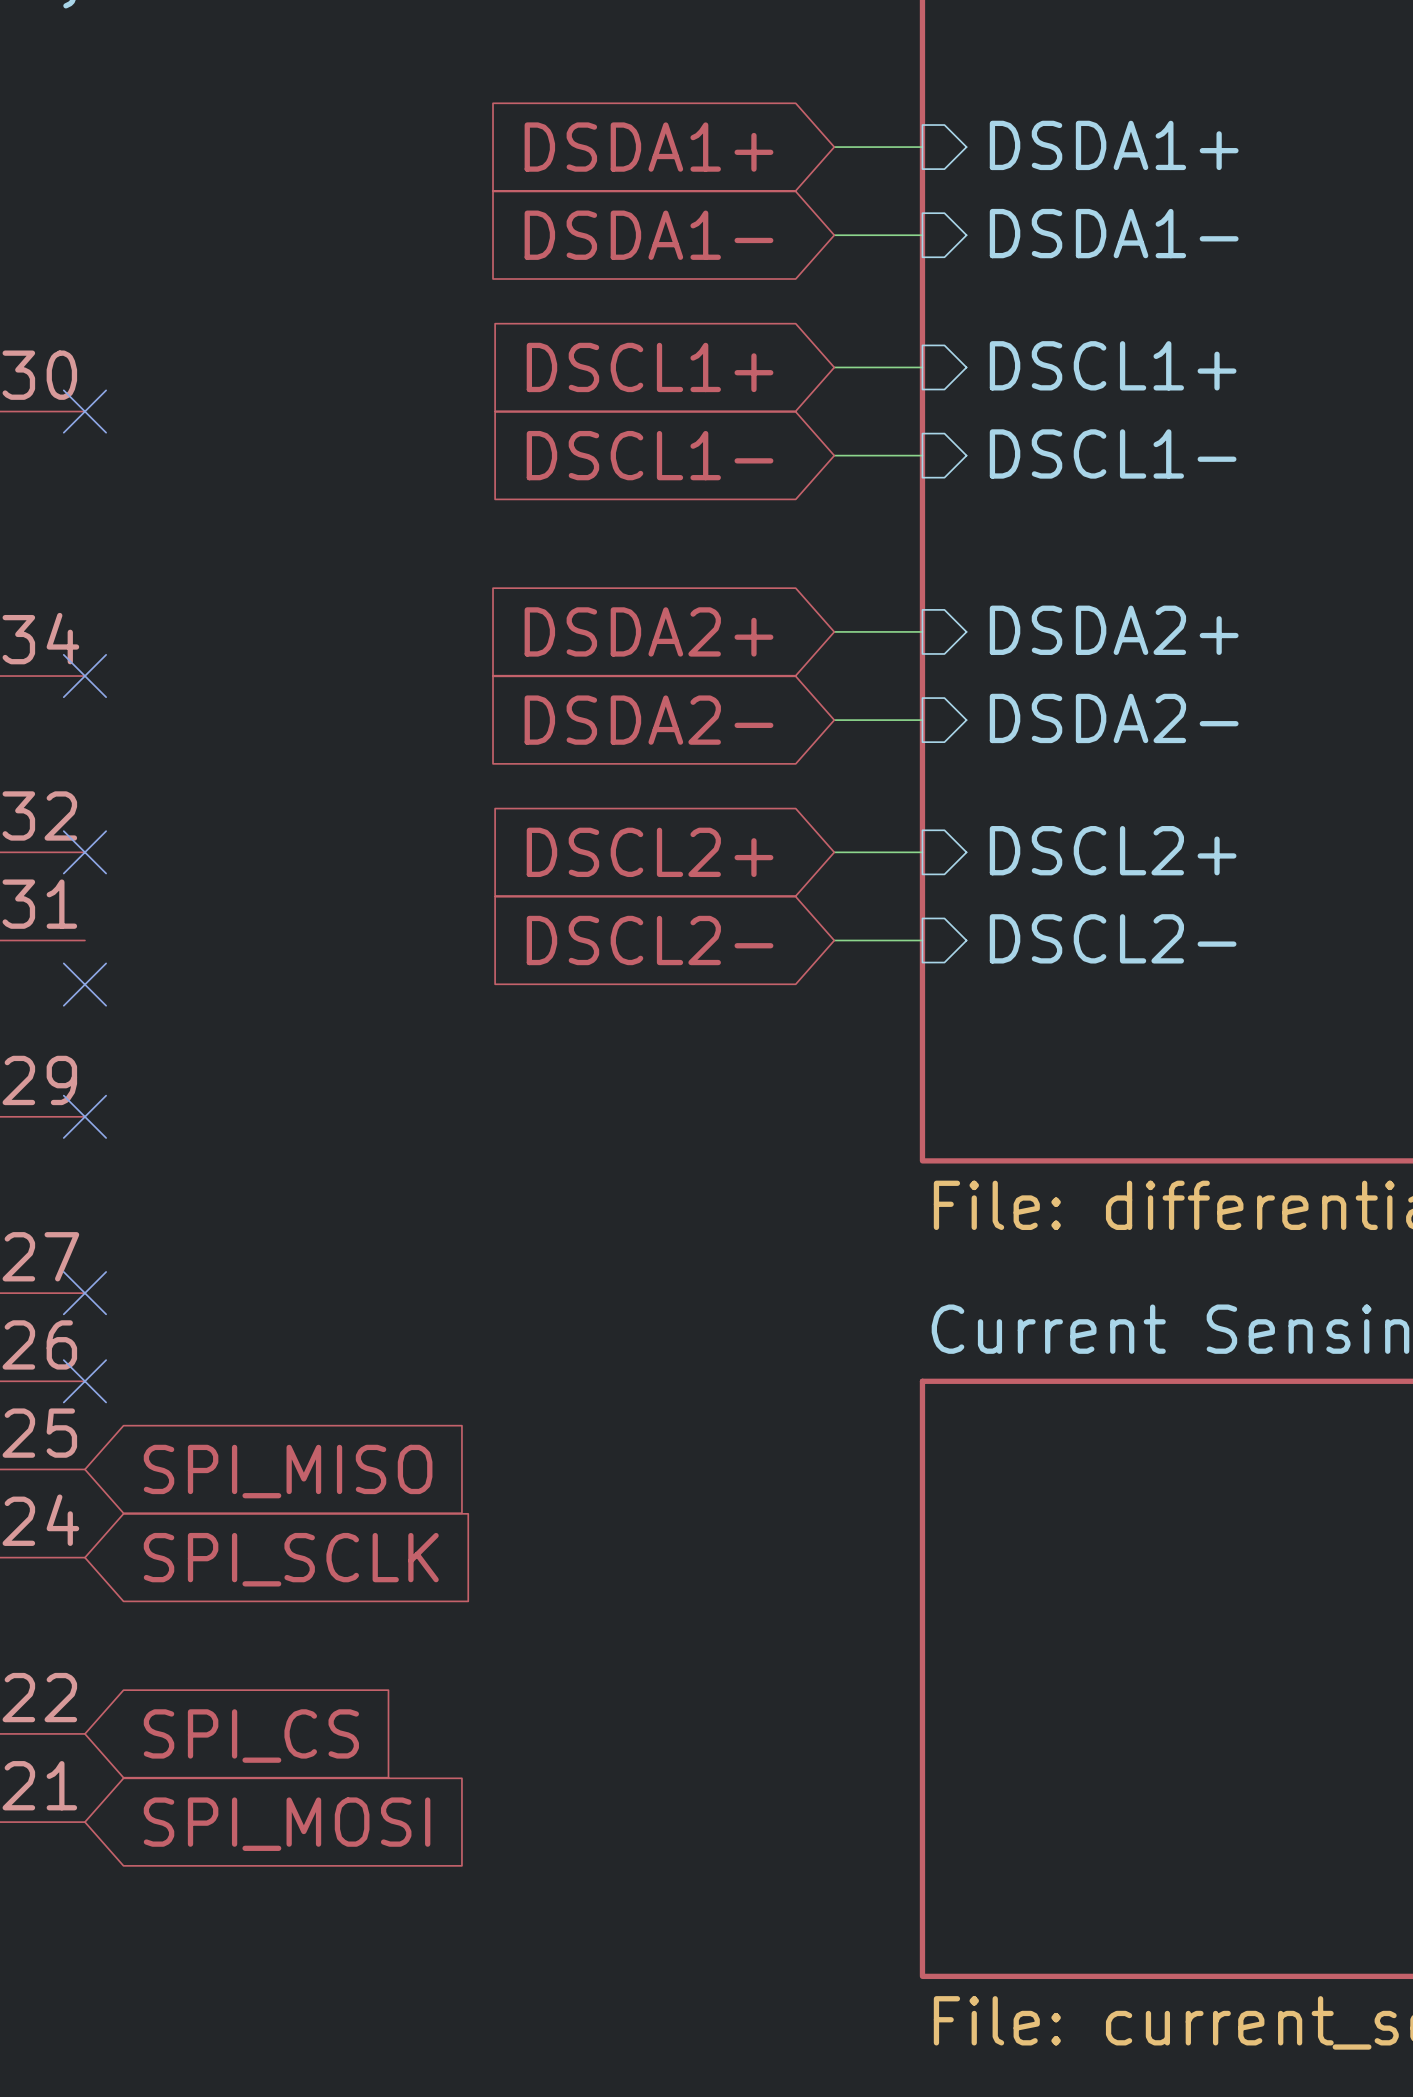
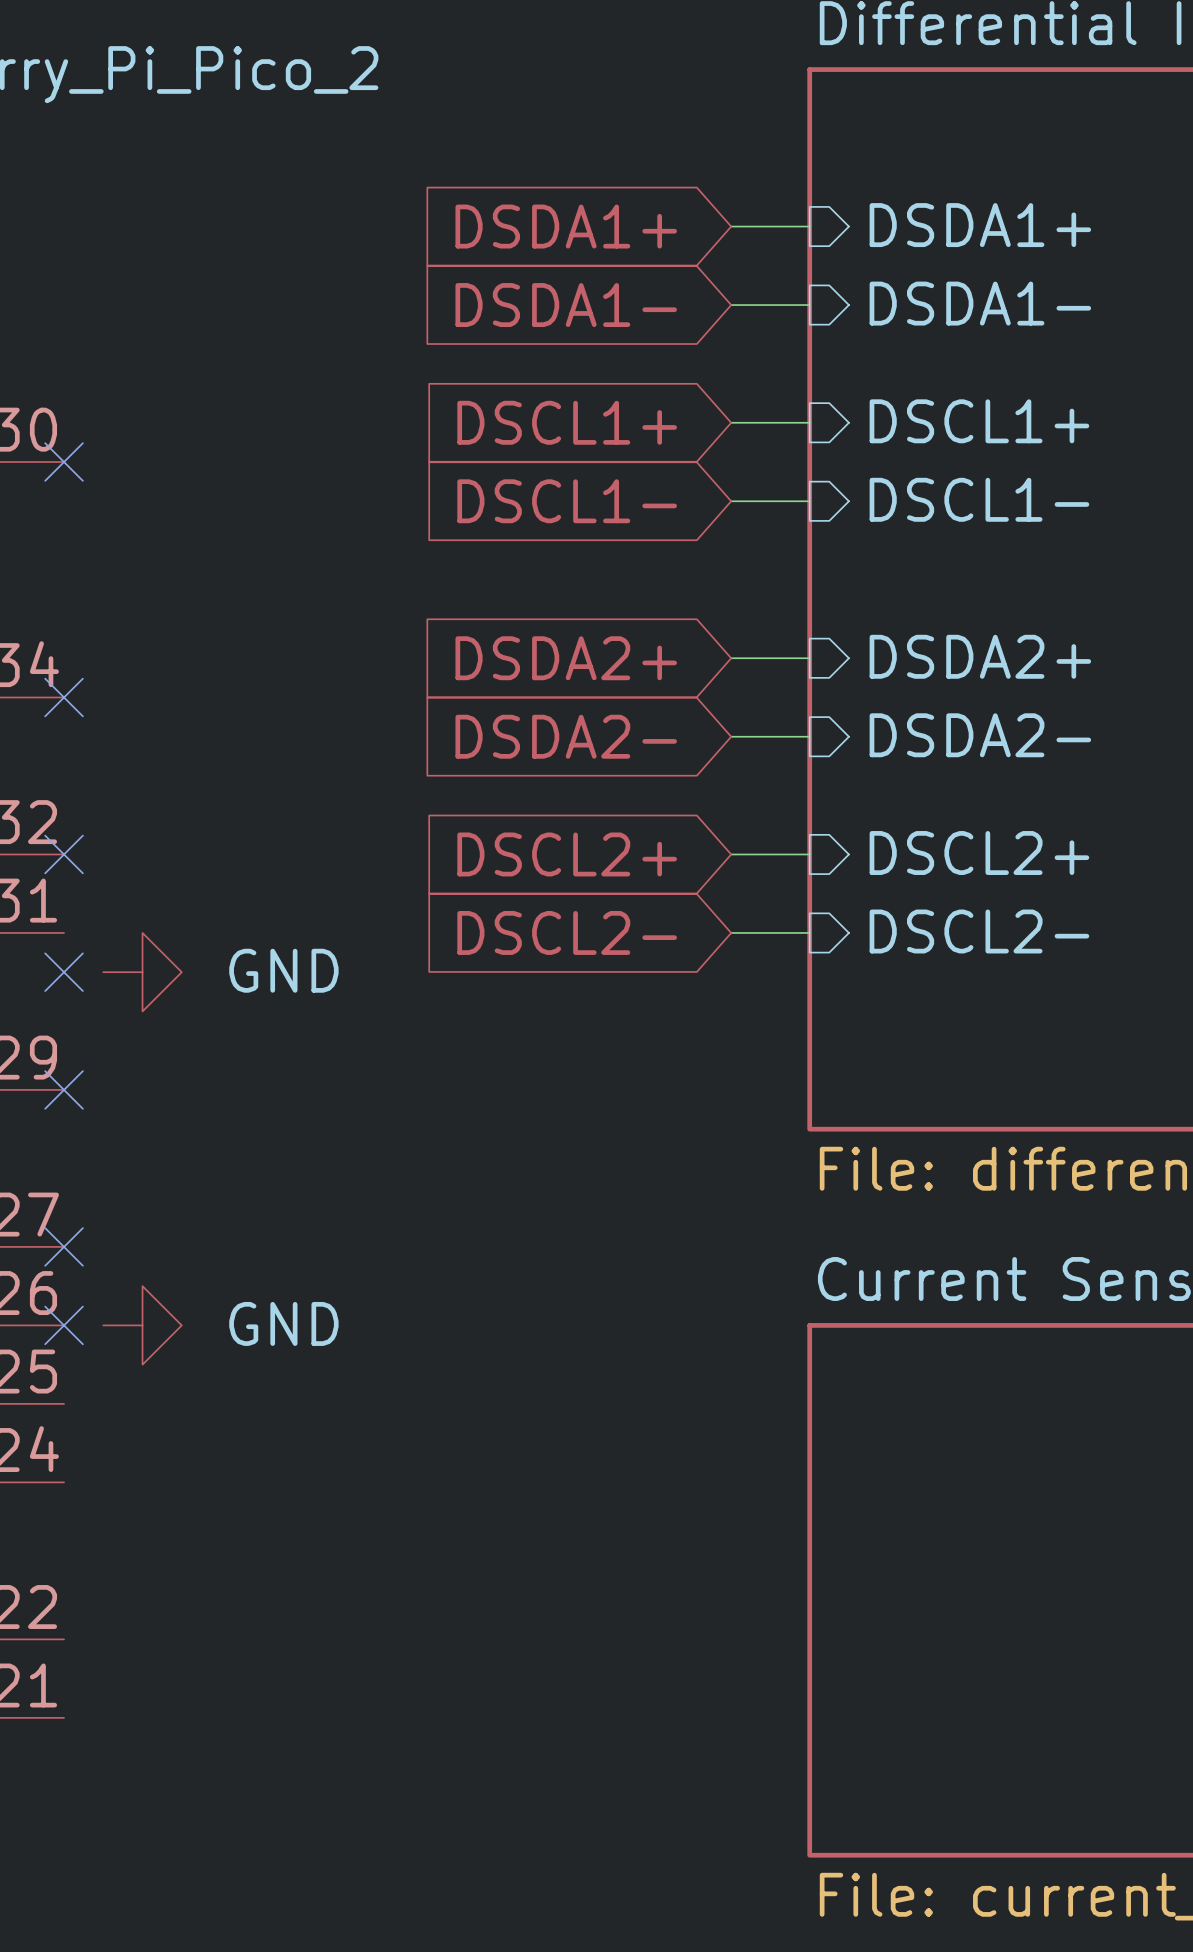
power symbol: none -> GND (142, 972)
power symbol: none -> GND (142, 1325)
global label: SPI_MISO (288, 1471) -> none
global label: SPI_SCLK (291, 1559) -> none
global label: SPI_CS (251, 1736) -> none
global label: SPI_MOSI (287, 1824) -> none

